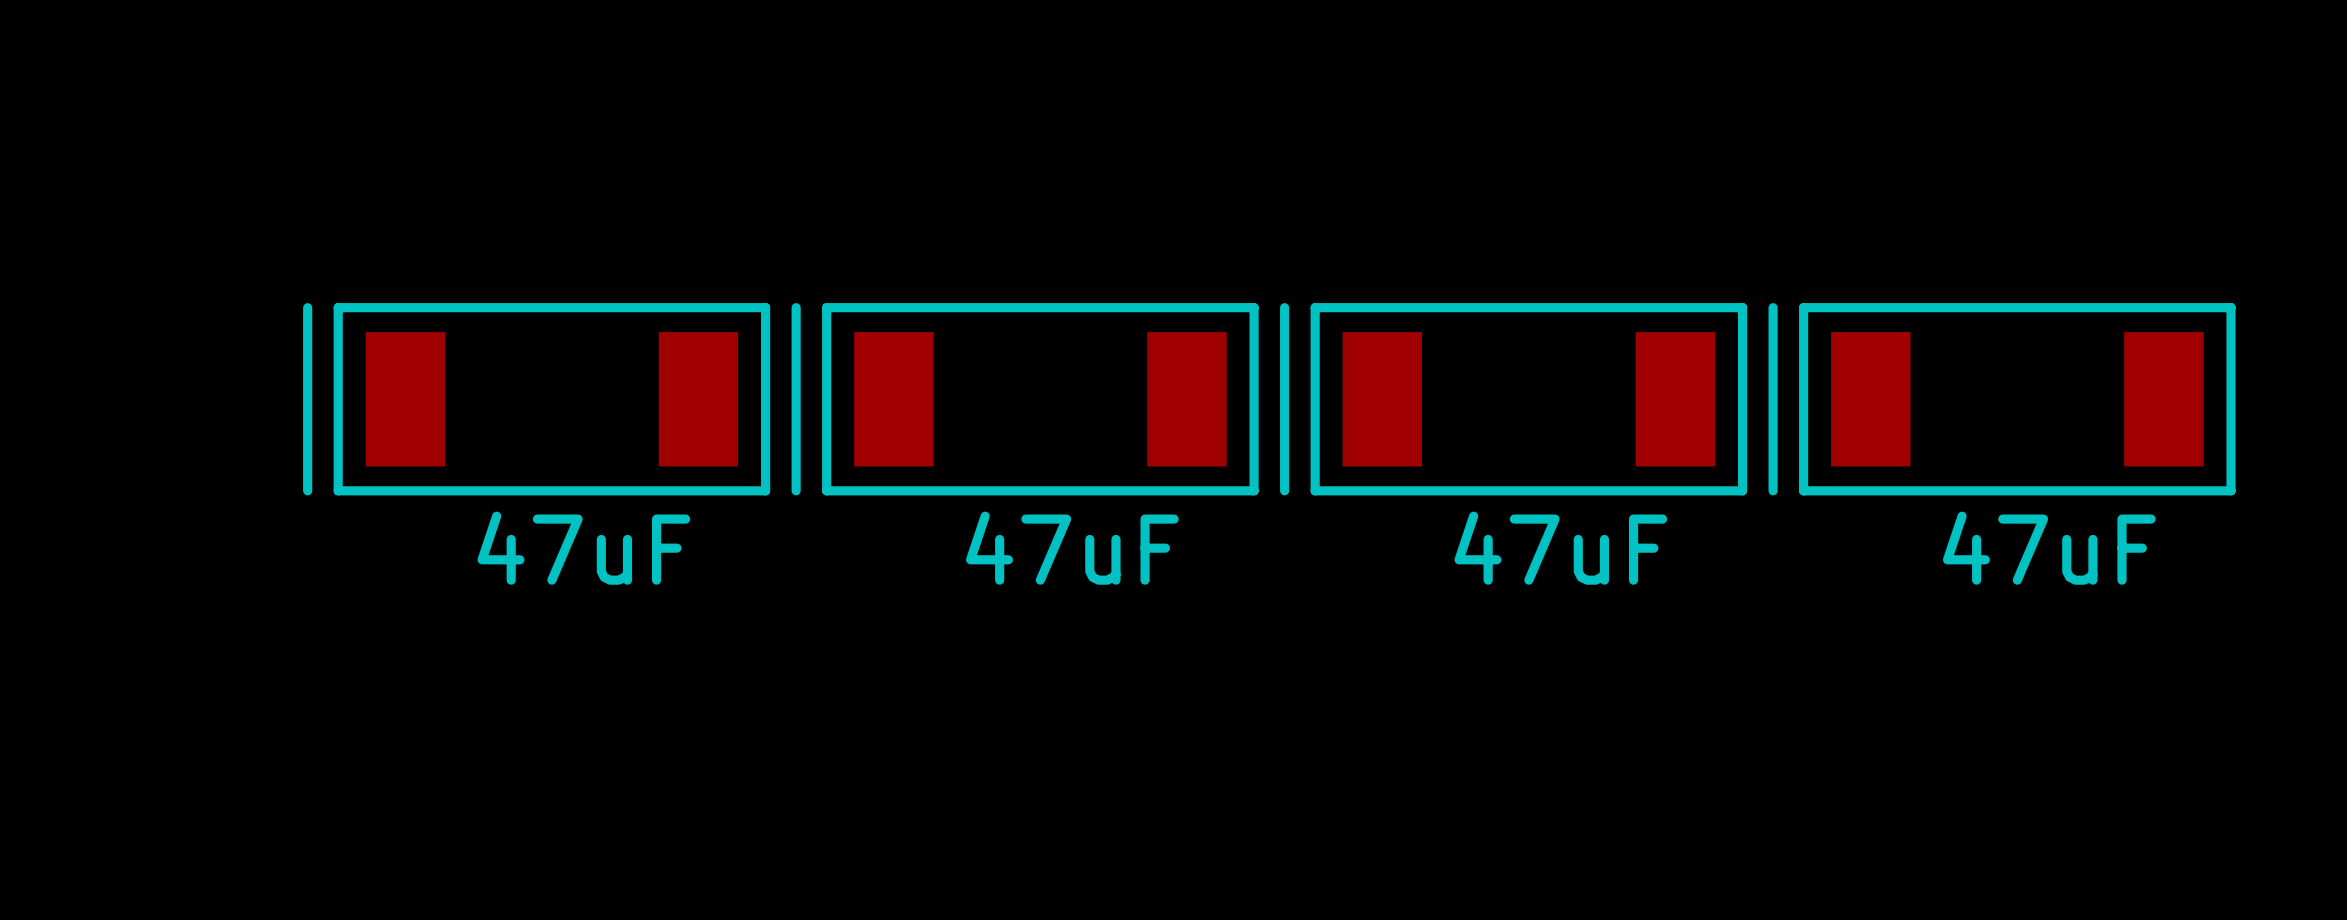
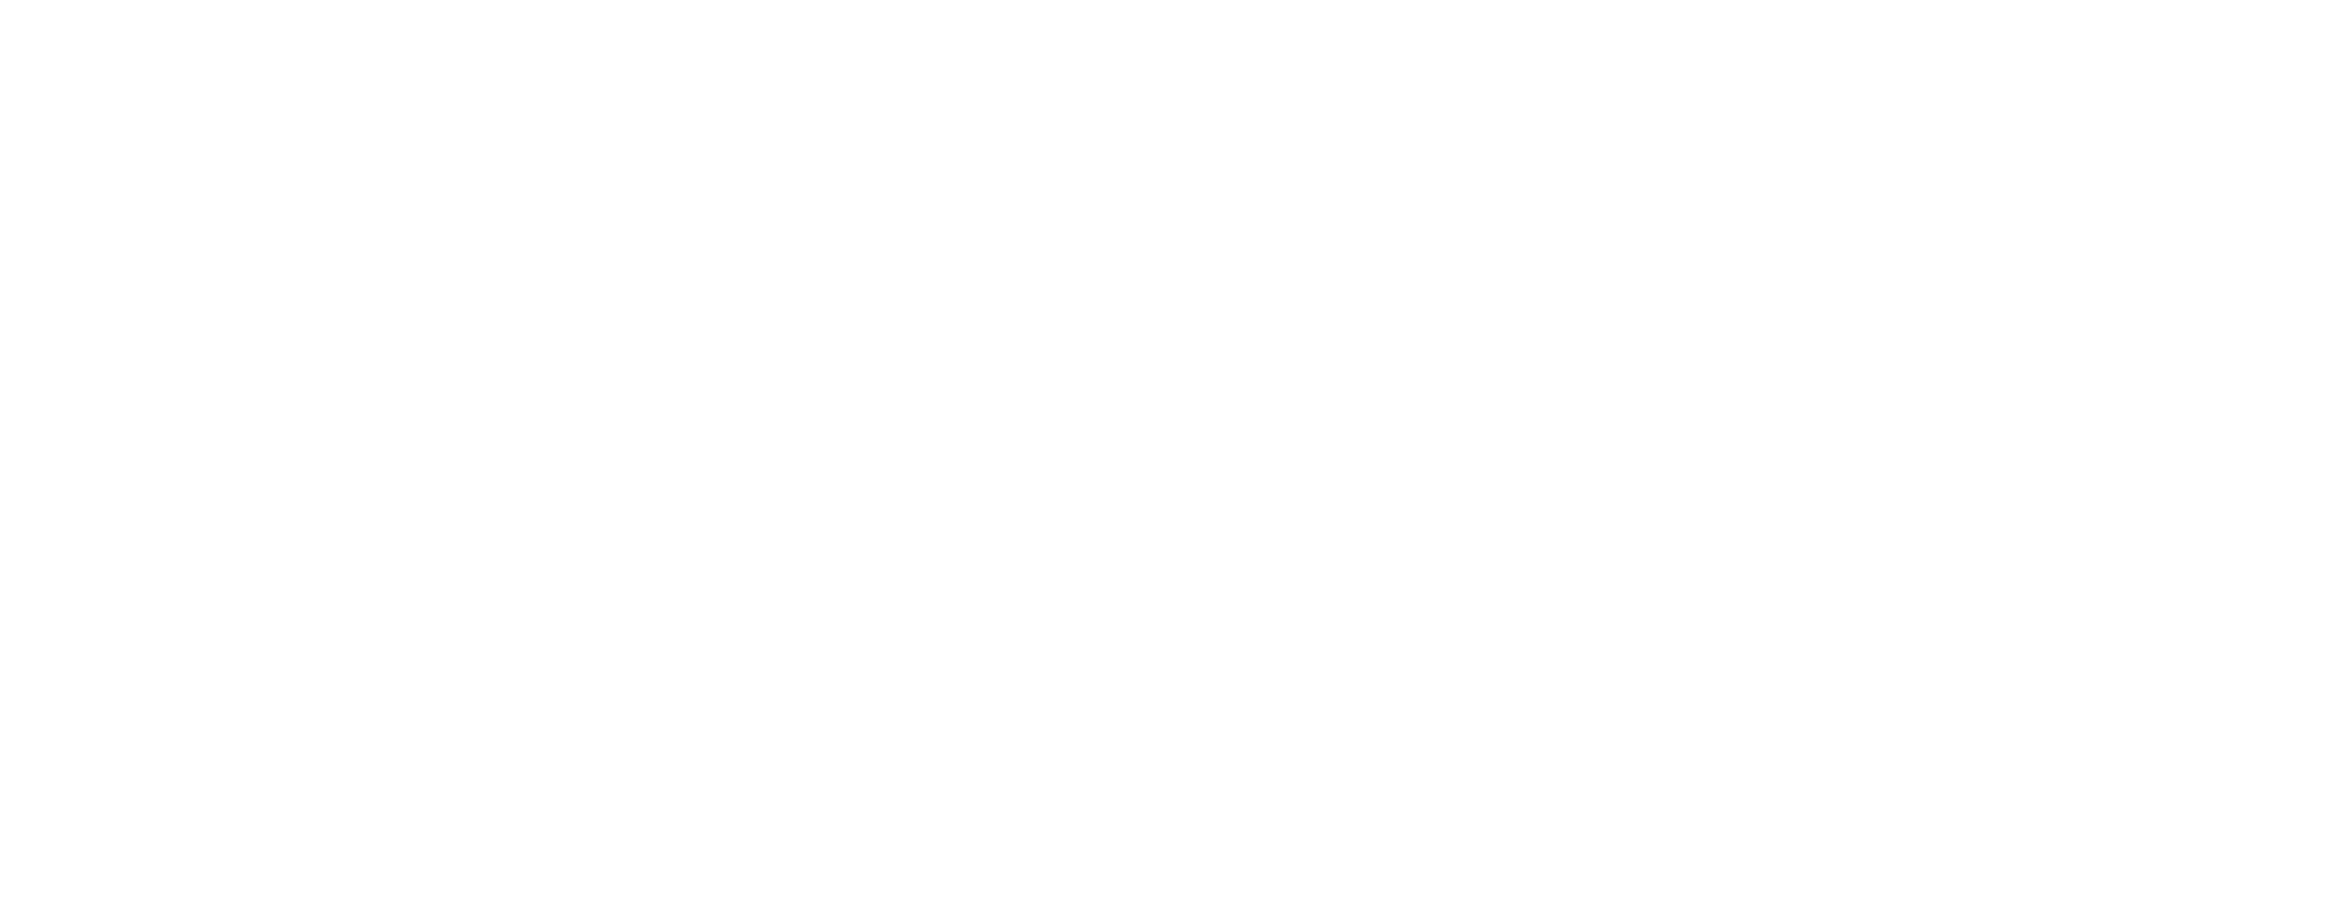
part: 47uF (536, 399) -> none
part: 47uF (1025, 399) -> none
part: 47uF (1513, 399) -> none
part: 47uF (2002, 399) -> none

